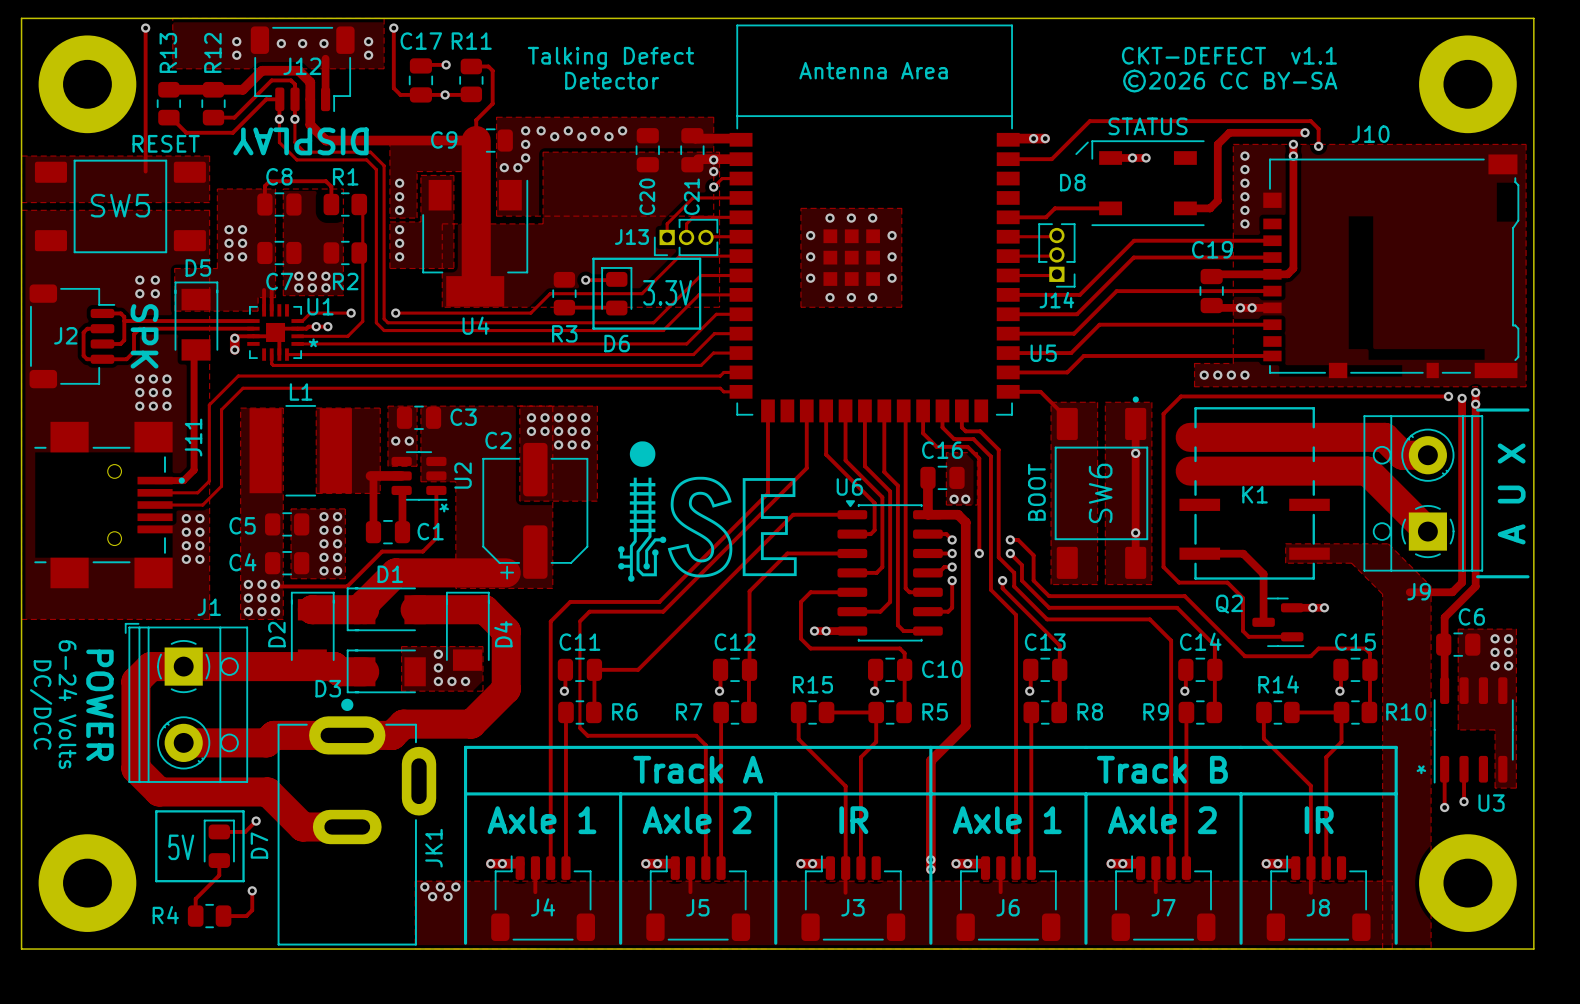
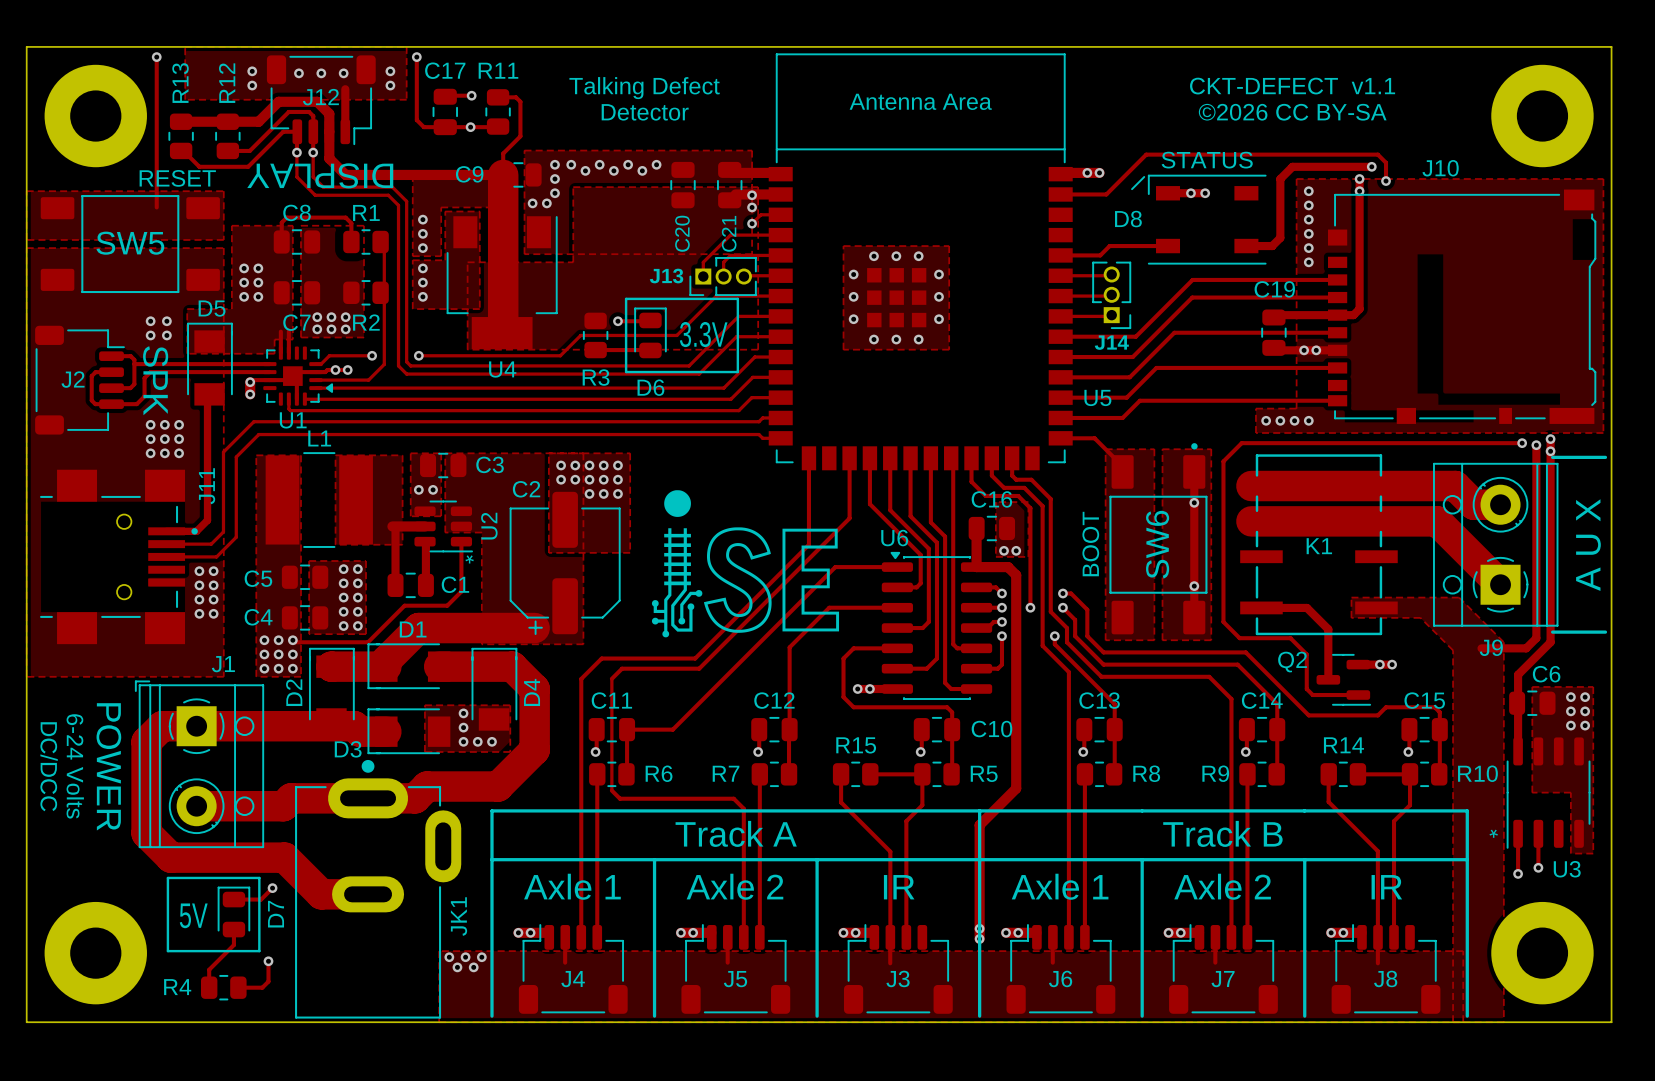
U1 footprint: [247, 304, 304, 361] -> [263, 346, 334, 406]
U1 name position: U1 (320, 306) -> U1 (293, 420)

